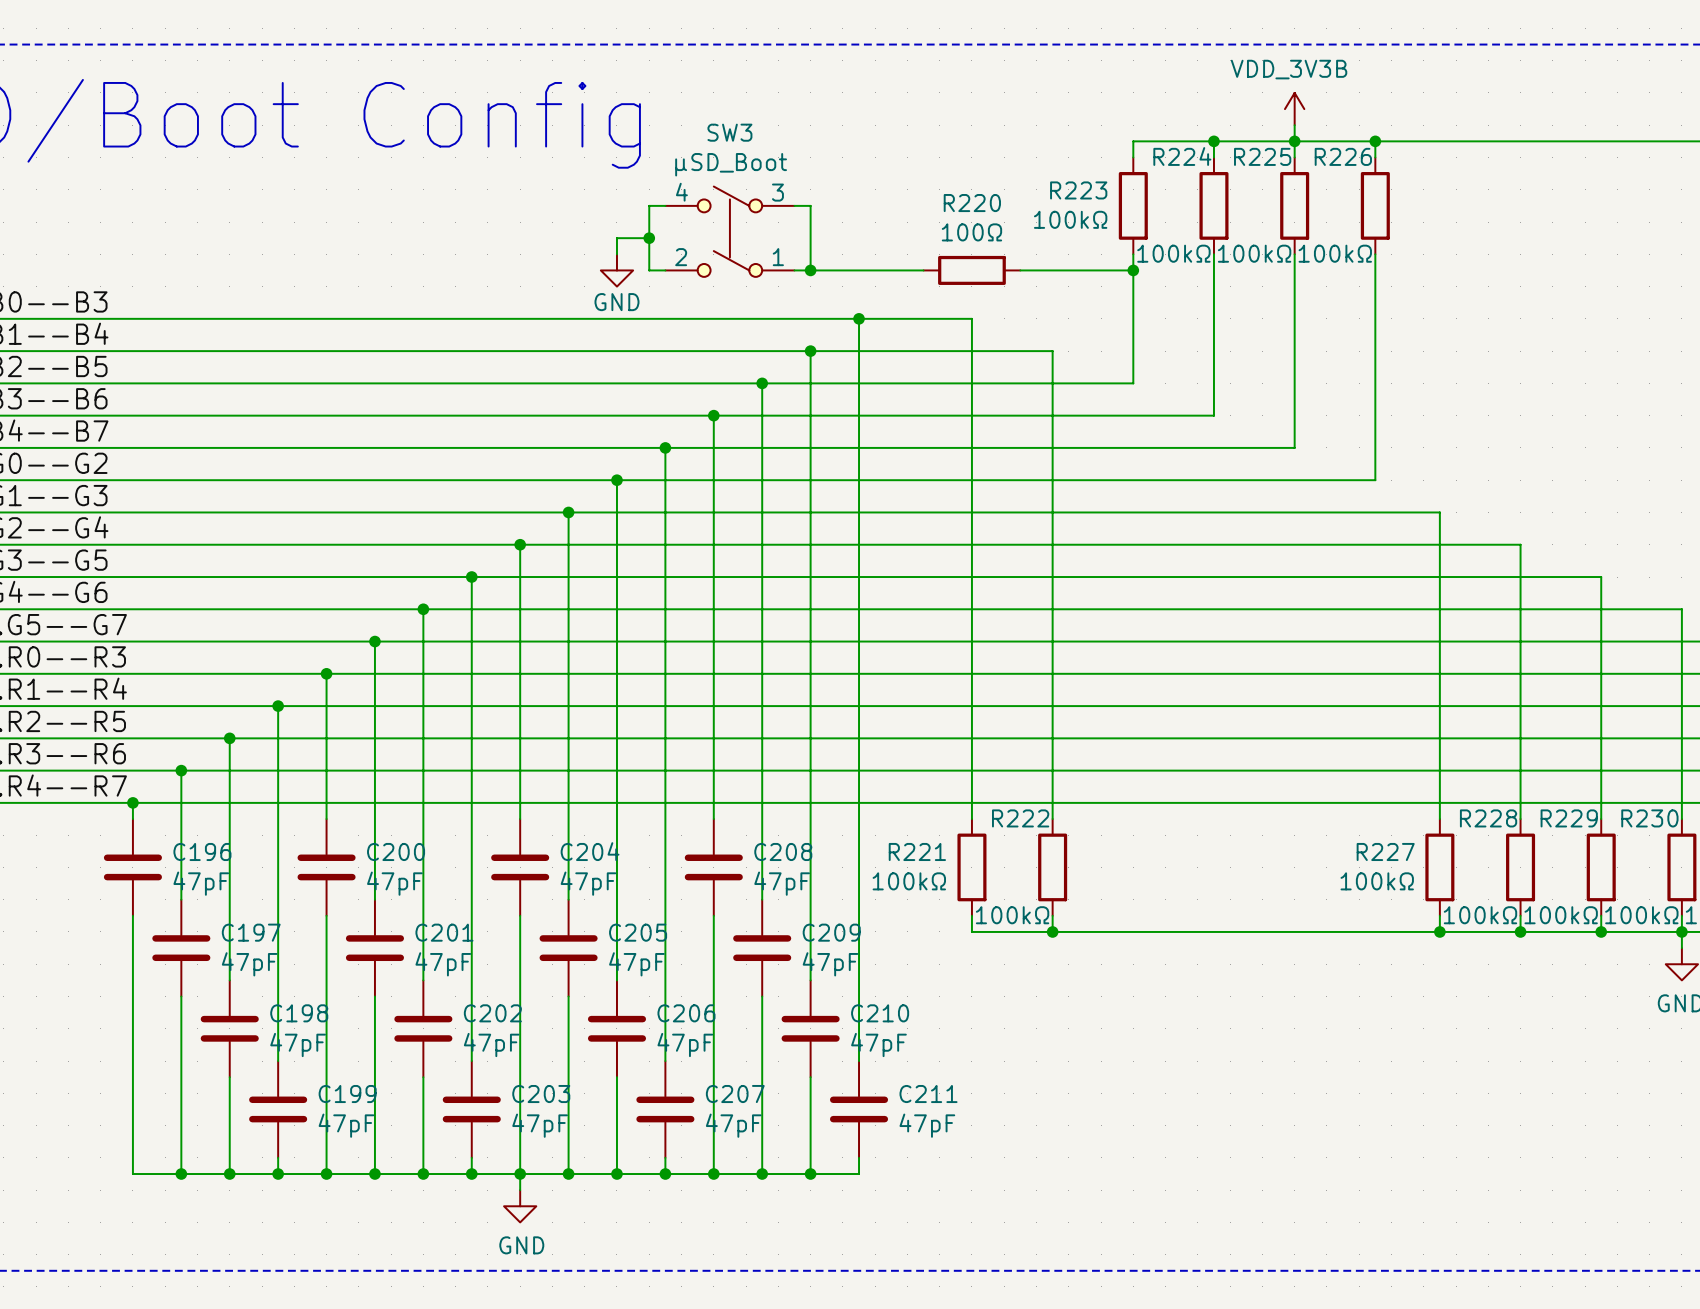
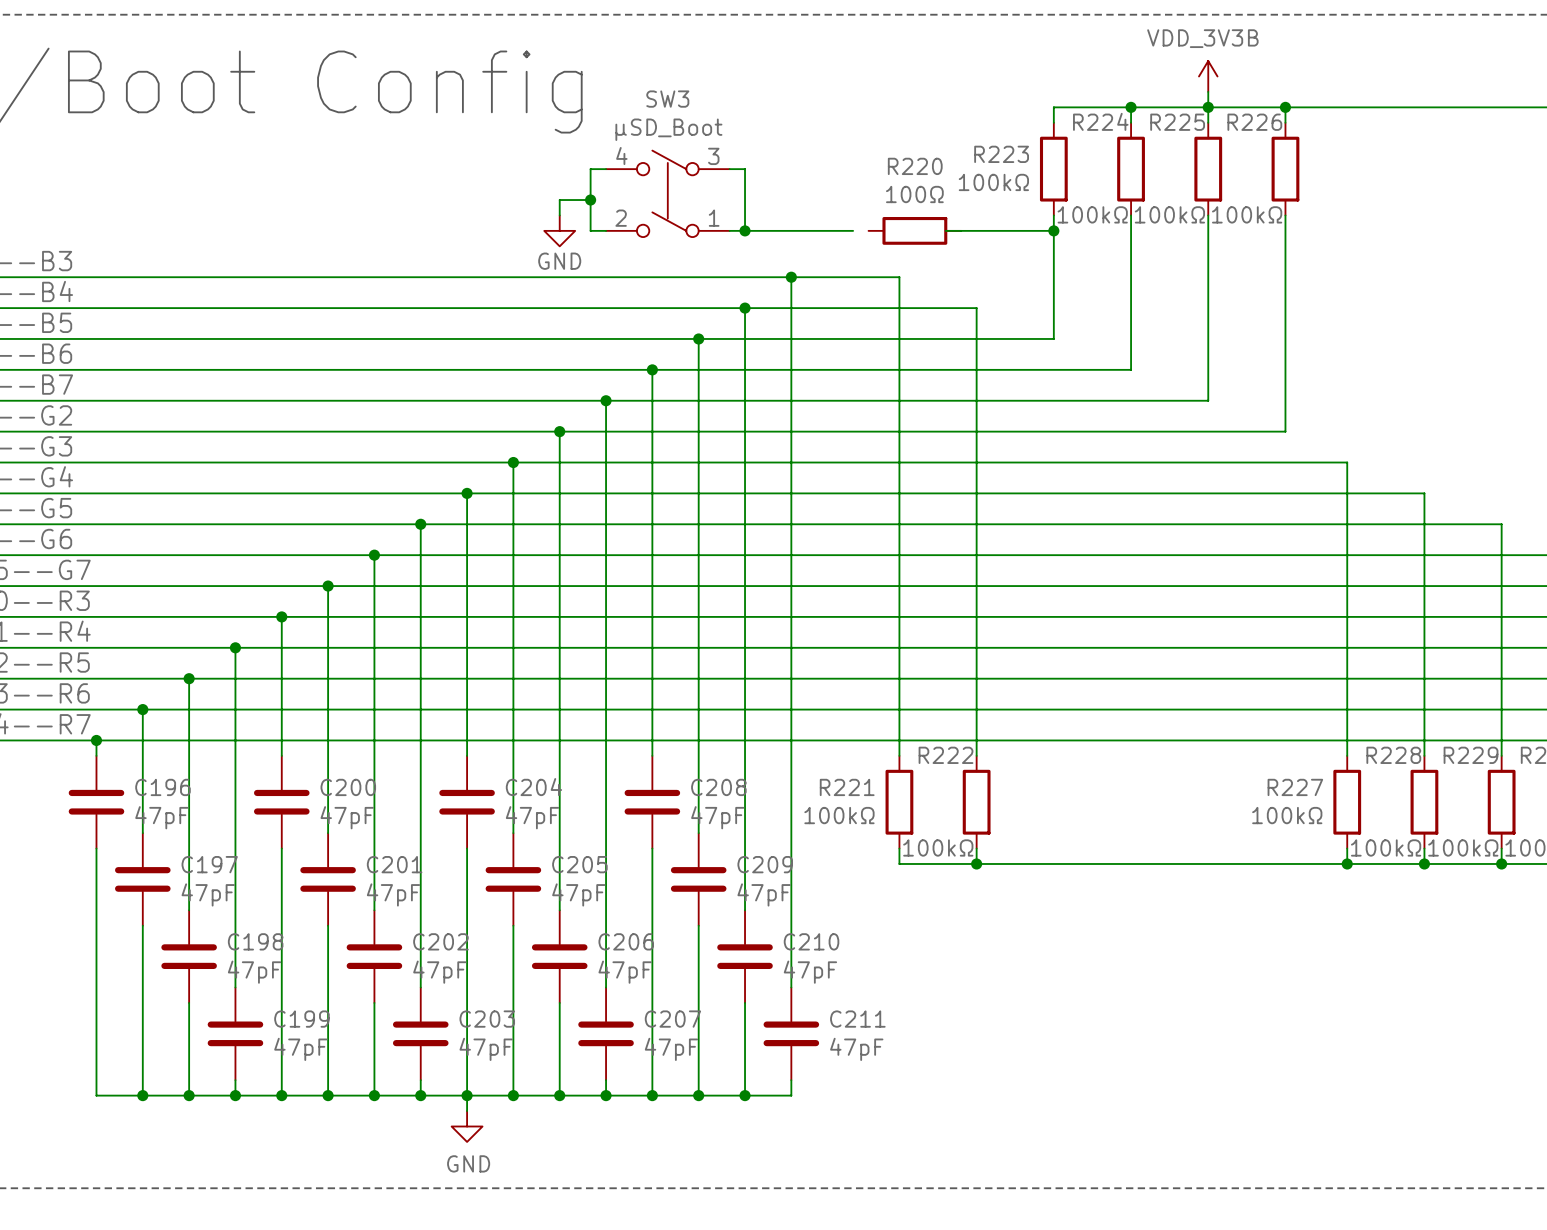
R220 position: (971, 270) -> (914, 230)

